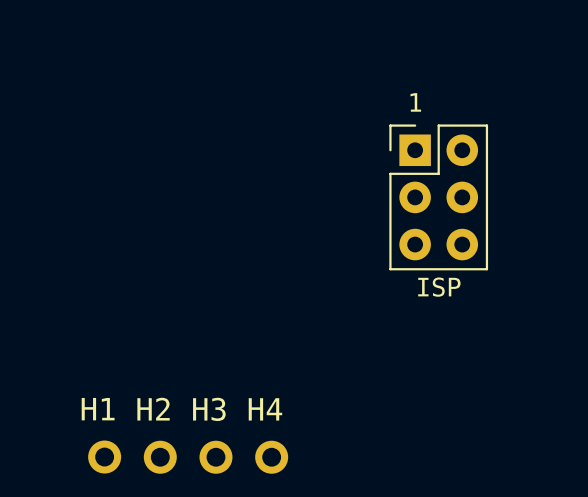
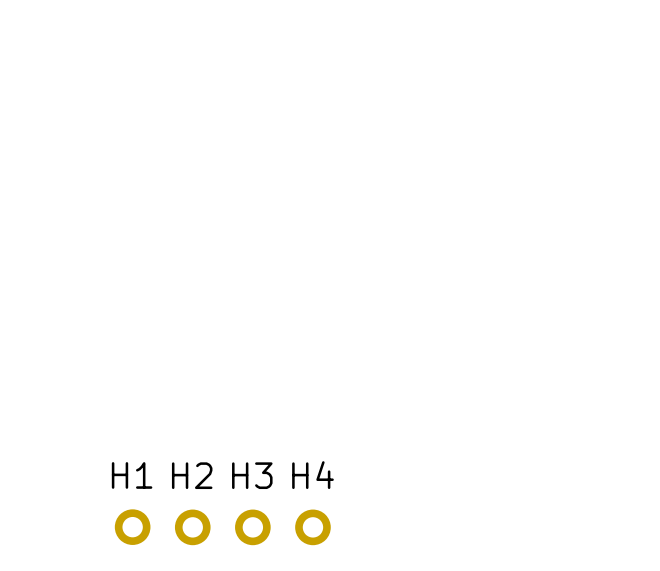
part: ISP (438, 197) -> none

